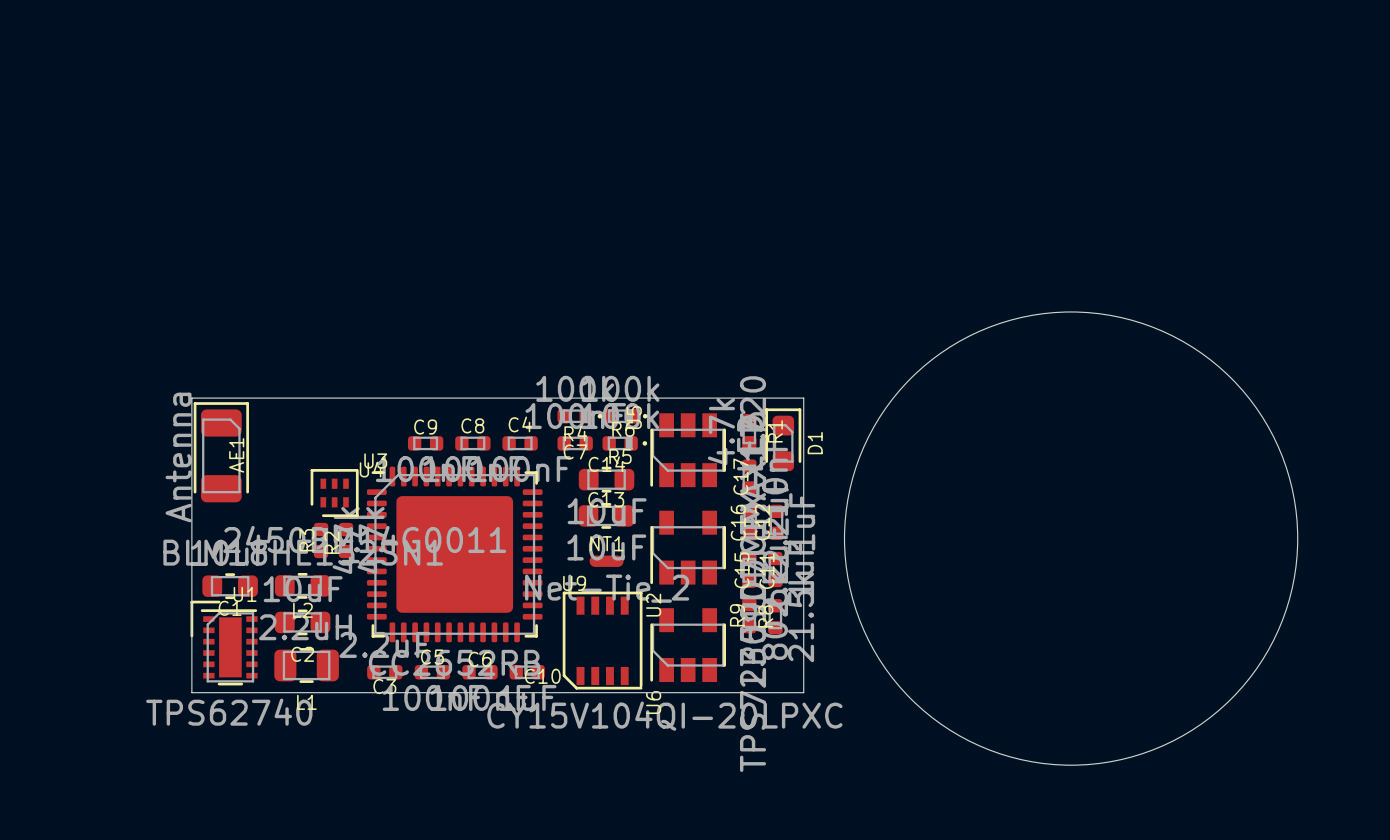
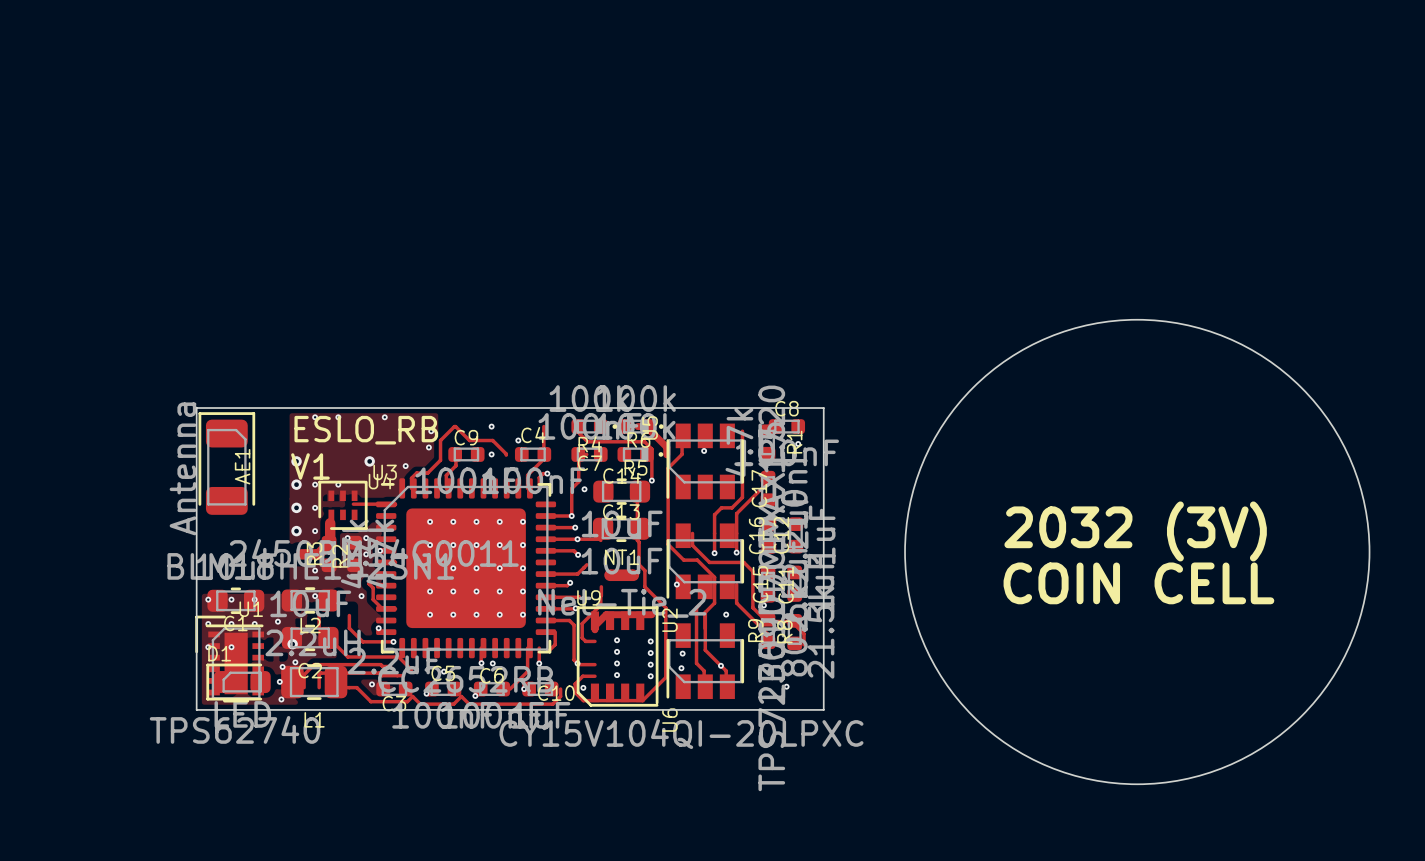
via: none -> (315, 417)
via: none -> (338, 417)
via: none -> (384, 417)
via: none -> (491, 426)
track: none -> (543, 426) (543, 459) (527, 475) (527, 488)
track: none -> (579, 426) (579, 434) (587, 441) (644, 441) (651, 449) (651, 480)
track: none -> (637, 426) (646, 426) (666, 447) (666, 454)
text: none -> ESLO_RB (366, 430)
via: none -> (431, 431)
track: none -> (682, 431) (682, 454) (668, 468) (668, 544) (683, 560) (697, 560) (714, 577) (714, 603) (705, 612) (705, 650) (726, 670) (726, 686)
track: none -> (742, 431) (742, 497) (732, 507) (721, 507) (714, 514) (714, 553)
via: none -> (518, 440)
via: none -> (798, 444)
via: none -> (428, 447)
D1 rotation: 0° (783, 439) -> 90° counterclockwise (238, 682)
D1 position: (783, 439) -> (238, 682)
via: none -> (704, 450)
C9 position: (425, 443) -> (466, 454)
track: none -> (455, 454) (455, 465) (446, 475) (446, 488)
C8 position: (472, 443) -> (786, 426)
via: none -> (491, 454)
track: none -> (586, 454) (578, 455) (578, 481) (571, 488) (571, 516) (555, 516)
track: none -> (506, 455) (492, 440) (469, 440) (454, 426) (440, 440) (440, 460) (427, 473) (416, 473) (411, 478) (411, 488)
via: none -> (296, 461)
via: none -> (369, 461)
track: none -> (766, 464) (766, 484) (736, 513) (736, 552)
via: none -> (405, 466)
text: none -> V1 (310, 466)
track: none -> (547, 473) (543, 473) (539, 477) (539, 488)
via: none -> (547, 473)
via: none -> (651, 480)
via: none -> (296, 484)
via: none -> (315, 484)
via: none -> (338, 484)
via: none -> (584, 489)
track: none -> (637, 499) (639, 564) (644, 570) (644, 586) (665, 607) (665, 677) (642, 700) (583, 700) (575, 692) (575, 683) (582, 676) (594, 676)
track: none -> (353, 504) (395, 504)
via: none -> (296, 507)
via: none -> (315, 507)
via: none -> (571, 516)
via: none -> (430, 521)
via: none -> (453, 521)
via: none -> (476, 521)
via: none -> (499, 521)
via: none -> (522, 521)
track: none -> (330, 523) (330, 542) (318, 554) (301, 554)
track: none -> (555, 527) (575, 527)
via: none -> (575, 527)
via: none -> (296, 531)
via: none -> (315, 531)
text: none -> 2032 (3V) (1135, 531)
track: none -> (692, 533) (692, 545) (709, 562) (743, 562) (752, 571) (752, 607) (766, 621) (791, 621) (803, 633) (803, 644)
via: none -> (347, 538)
via: none -> (366, 538)
track: none -> (555, 539) (600, 540)
via: none -> (577, 539)
via: none -> (430, 545)
via: none -> (453, 545)
via: none -> (476, 545)
via: none -> (499, 545)
via: none -> (522, 545)
via: none -> (380, 550)
track: none -> (555, 550) (574, 550) (578, 554)
round board edge position: (1071, 538) -> (1137, 552)
via: none -> (714, 553)
via: none -> (736, 552)
via: none -> (366, 554)
via: none -> (578, 554)
track: none -> (586, 564) (577, 574) (555, 574)
via: none -> (453, 568)
via: none -> (476, 568)
via: none -> (499, 568)
via: none -> (522, 568)
via: none -> (315, 570)
track: none -> (570, 582) (567, 585) (555, 585)
via: none -> (570, 582)
track: none -> (368, 583) (373, 588) (373, 599) (382, 608) (395, 608)
text: none -> COIN CELL (1138, 583)
via: none -> (676, 584)
track: none -> (736, 584) (736, 603) (767, 633) (767, 644)
track: none -> (601, 586) (600, 605) (582, 623) (582, 637) (585, 641) (594, 641)
via: none -> (430, 591)
via: none -> (453, 591)
via: none -> (476, 591)
via: none -> (499, 591)
via: none -> (522, 591)
via: none -> (315, 596)
via: none -> (361, 596)
track: none -> (579, 596) (555, 597)
via: none -> (208, 599)
via: none -> (231, 599)
via: none -> (254, 599)
track: none -> (699, 604) (696, 607) (696, 663) (704, 670) (704, 686)
via: none -> (763, 605)
track: none -> (575, 608) (555, 608)
via: none -> (575, 608)
via: none -> (430, 614)
via: none -> (453, 614)
via: none -> (476, 614)
via: none -> (499, 614)
via: none -> (522, 614)
track: none -> (651, 614) (606, 614) (594, 625) (594, 629)
via: none -> (726, 614)
track: none -> (319, 615) (319, 628) (347, 656) (398, 656) (411, 669)
track: none -> (349, 615) (349, 628) (362, 641) (393, 641)
track: none -> (555, 620) (569, 620) (574, 625) (574, 660) (578, 664) (594, 664)
via: none -> (277, 621)
via: none -> (208, 624)
via: none -> (231, 624)
via: none -> (254, 624)
via: none -> (378, 628)
track: none -> (555, 632) (555, 644) (549, 650)
via: none -> (617, 640)
via: none -> (650, 641)
via: none -> (393, 641)
via: none -> (292, 644)
via: none -> (208, 647)
via: none -> (231, 647)
track: none -> (481, 648) (481, 662)
track: none -> (527, 648) (527, 671) (510, 689)
track: none -> (539, 648) (539, 663)
via: none -> (617, 651)
via: none -> (650, 653)
via: none -> (682, 653)
via: none -> (295, 662)
via: none -> (481, 663)
via: none -> (492, 663)
via: none -> (539, 663)
via: none -> (577, 663)
via: none -> (617, 663)
via: none -> (650, 664)
via: none -> (720, 665)
via: none -> (282, 666)
track: none -> (390, 666) (380, 664) (314, 664) (304, 674) (304, 687)
via: none -> (681, 668)
via: none -> (443, 671)
via: none -> (617, 675)
track: none -> (401, 675) (382, 675) (379, 673) (320, 673) (319, 674) (319, 687)
via: none -> (650, 676)
via: none -> (279, 681)
via: none -> (372, 684)
track: none -> (334, 687) (356, 687) (370, 701) (407, 701) (412, 696) (420, 704) (453, 704) (461, 696) (469, 704) (552, 704) (560, 696) (560, 689)
via: none -> (786, 686)
via: none -> (583, 687)
via: none -> (524, 689)
via: none -> (426, 693)
via: none -> (475, 695)
via: none -> (281, 699)

